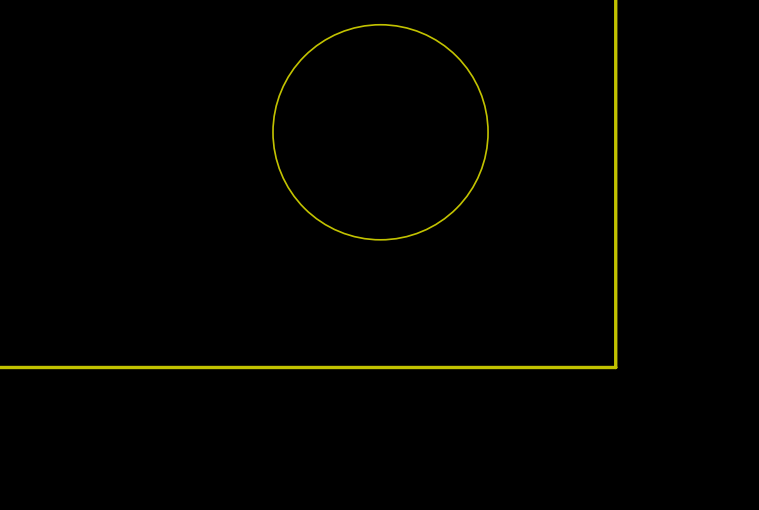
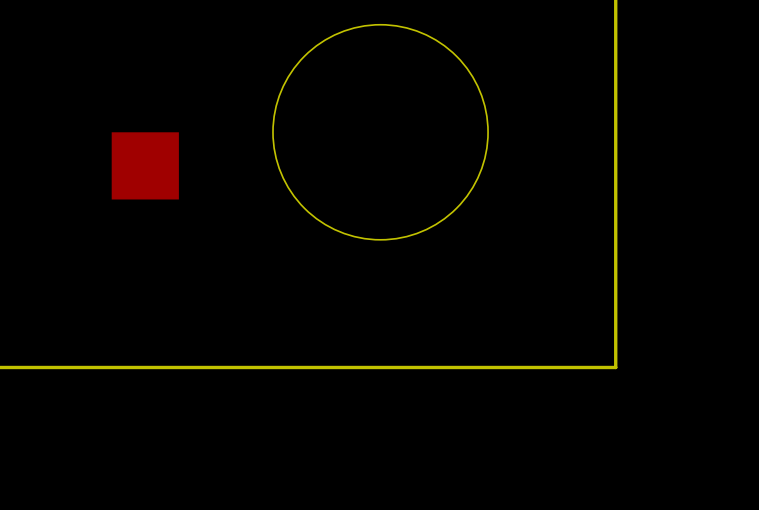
part: none -> (145, 165)

